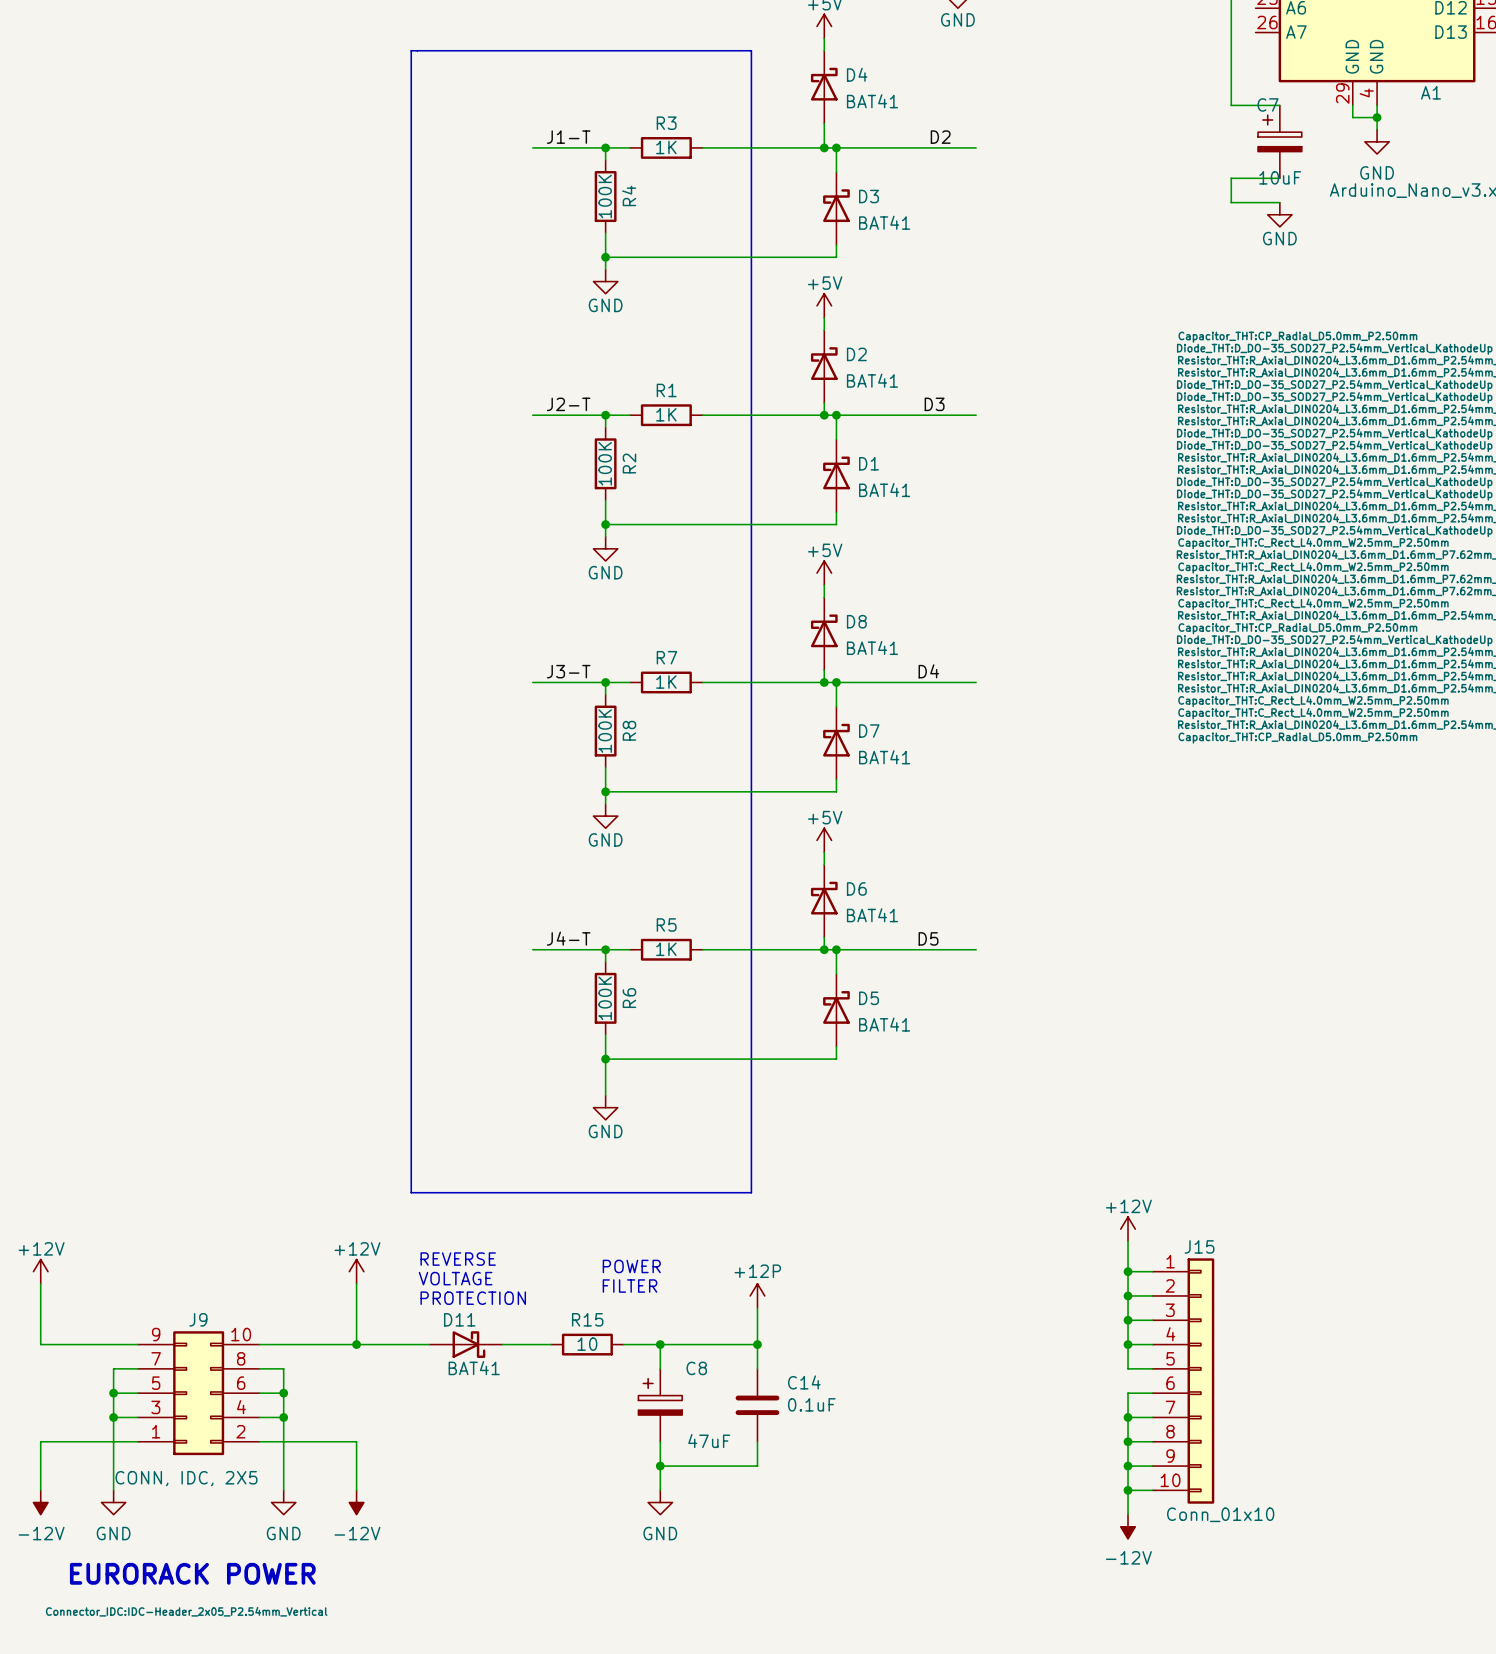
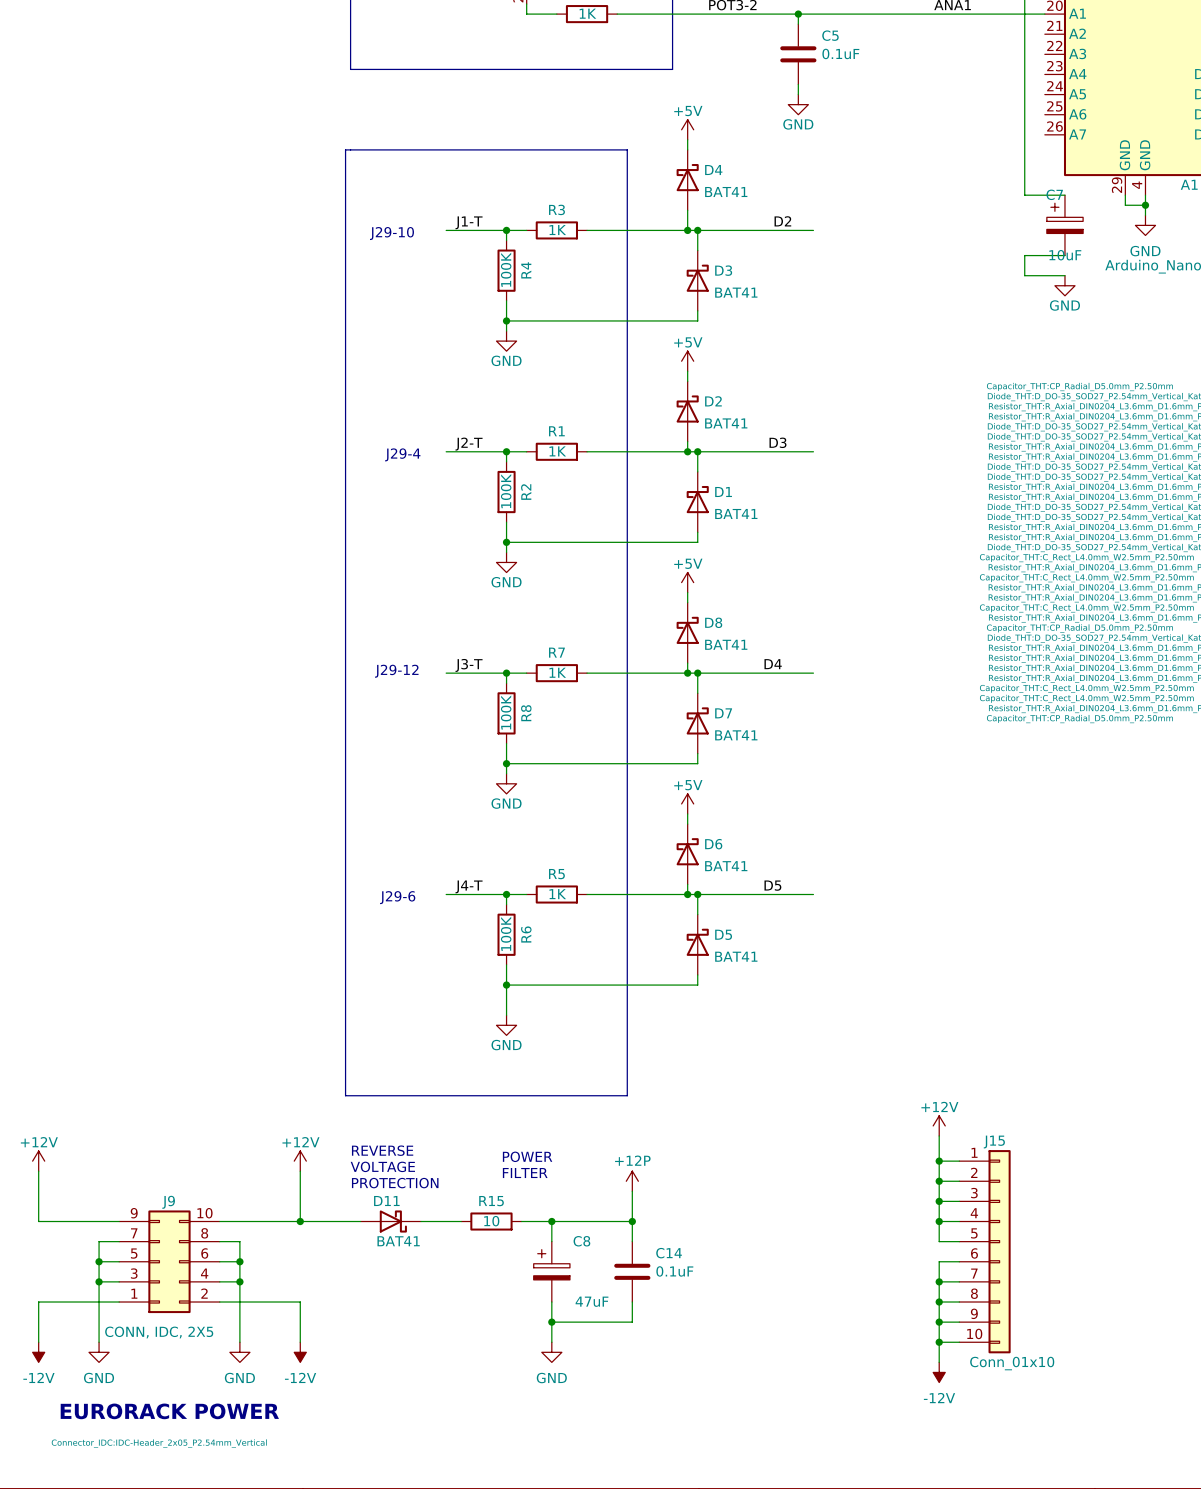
text: none -> J29-10 (391, 233)
text: none -> J29-4 (402, 454)
text: none -> J29-12 (396, 671)
text: none -> J29-6 (397, 897)

